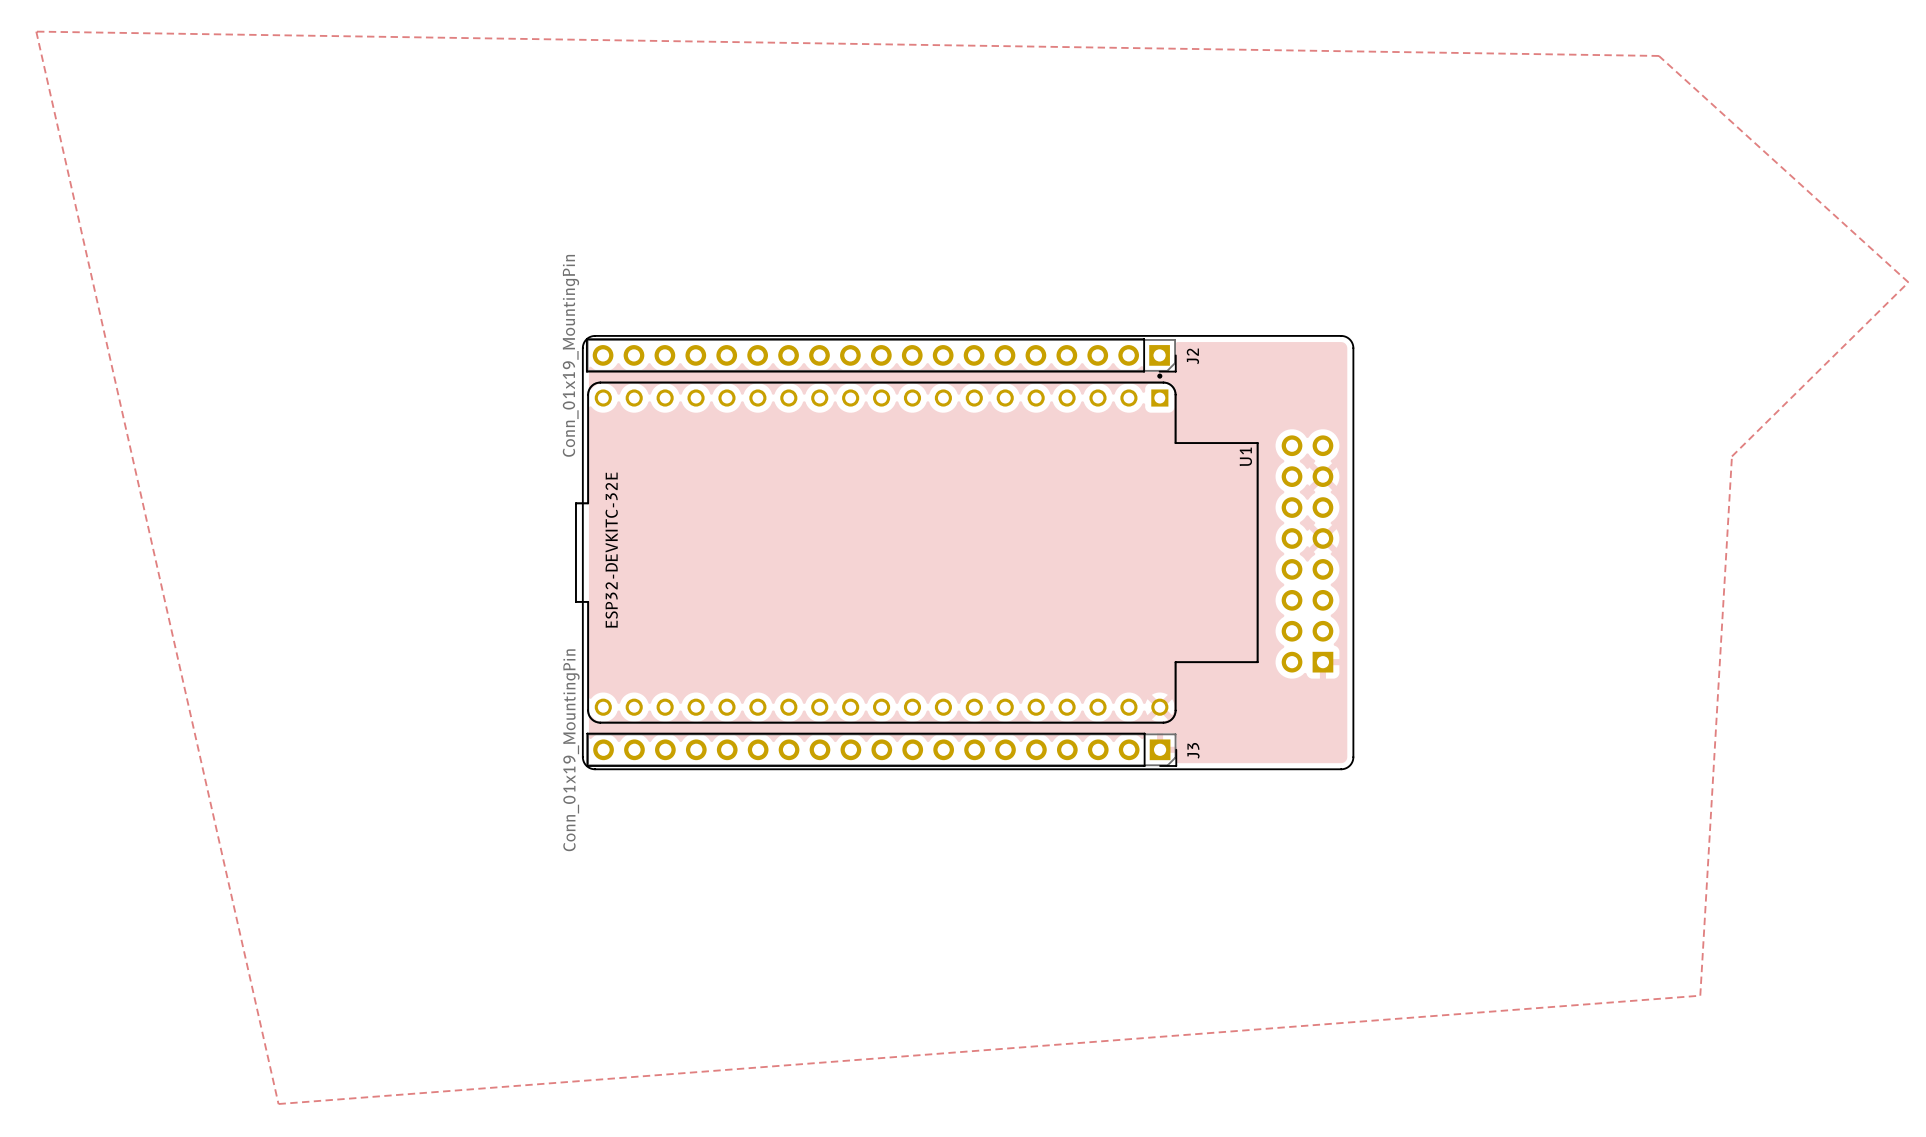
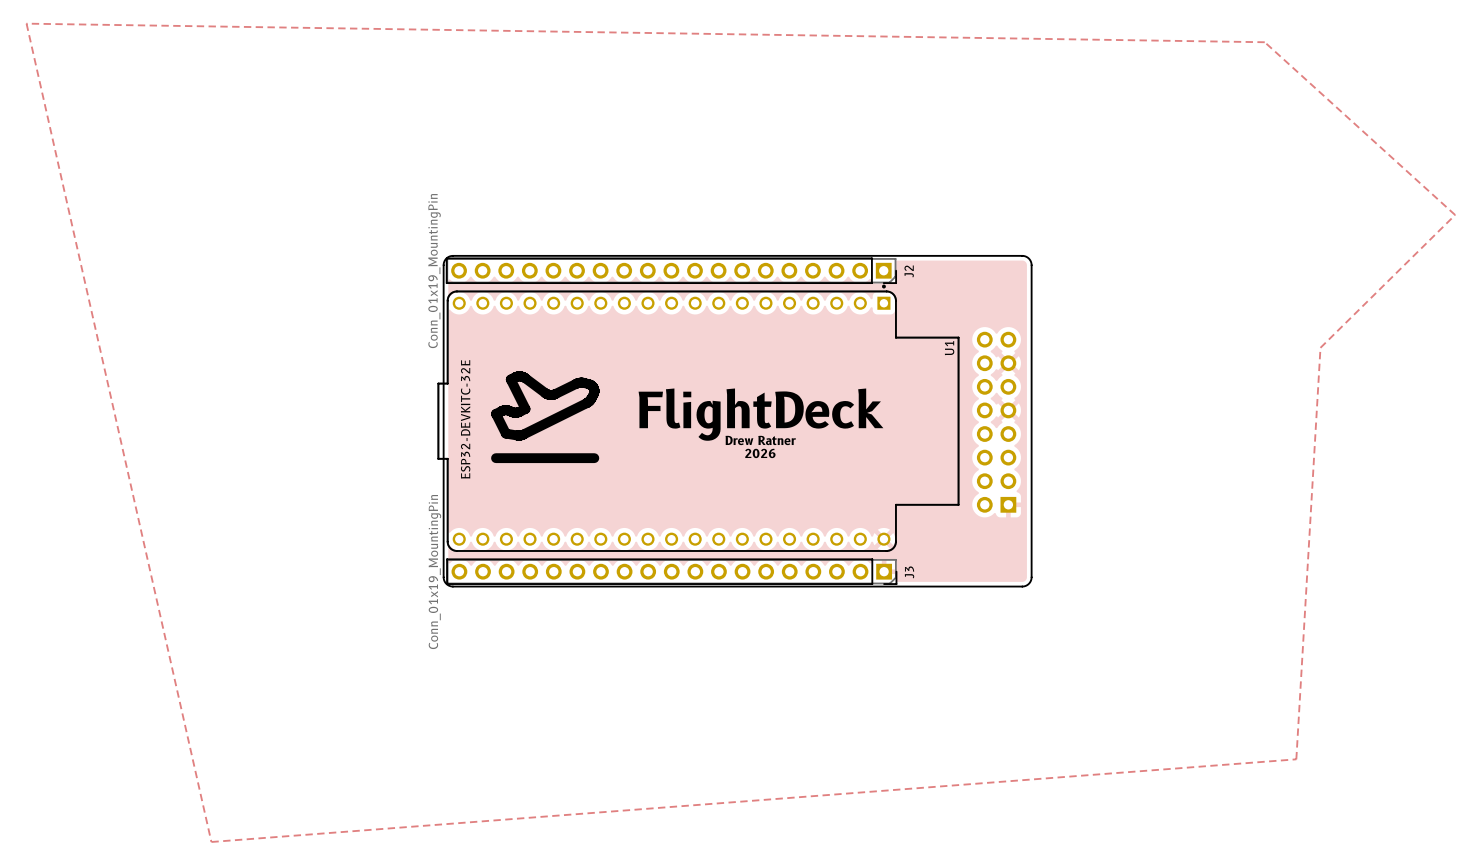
text: none -> FlightDeck (761, 414)
line: none -> (517, 435) (523, 434) (587, 402) (593, 393) (593, 387) (589, 384) (579, 382) (550, 394) (523, 376) (517, 376) (510, 379) (525, 409) (516, 412) (504, 410) (496, 413) (505, 433) (517, 435)
text: none -> Drew Ratner (760, 440)
text: none -> 2026 (760, 453)
line: none -> (496, 458) (594, 458)

